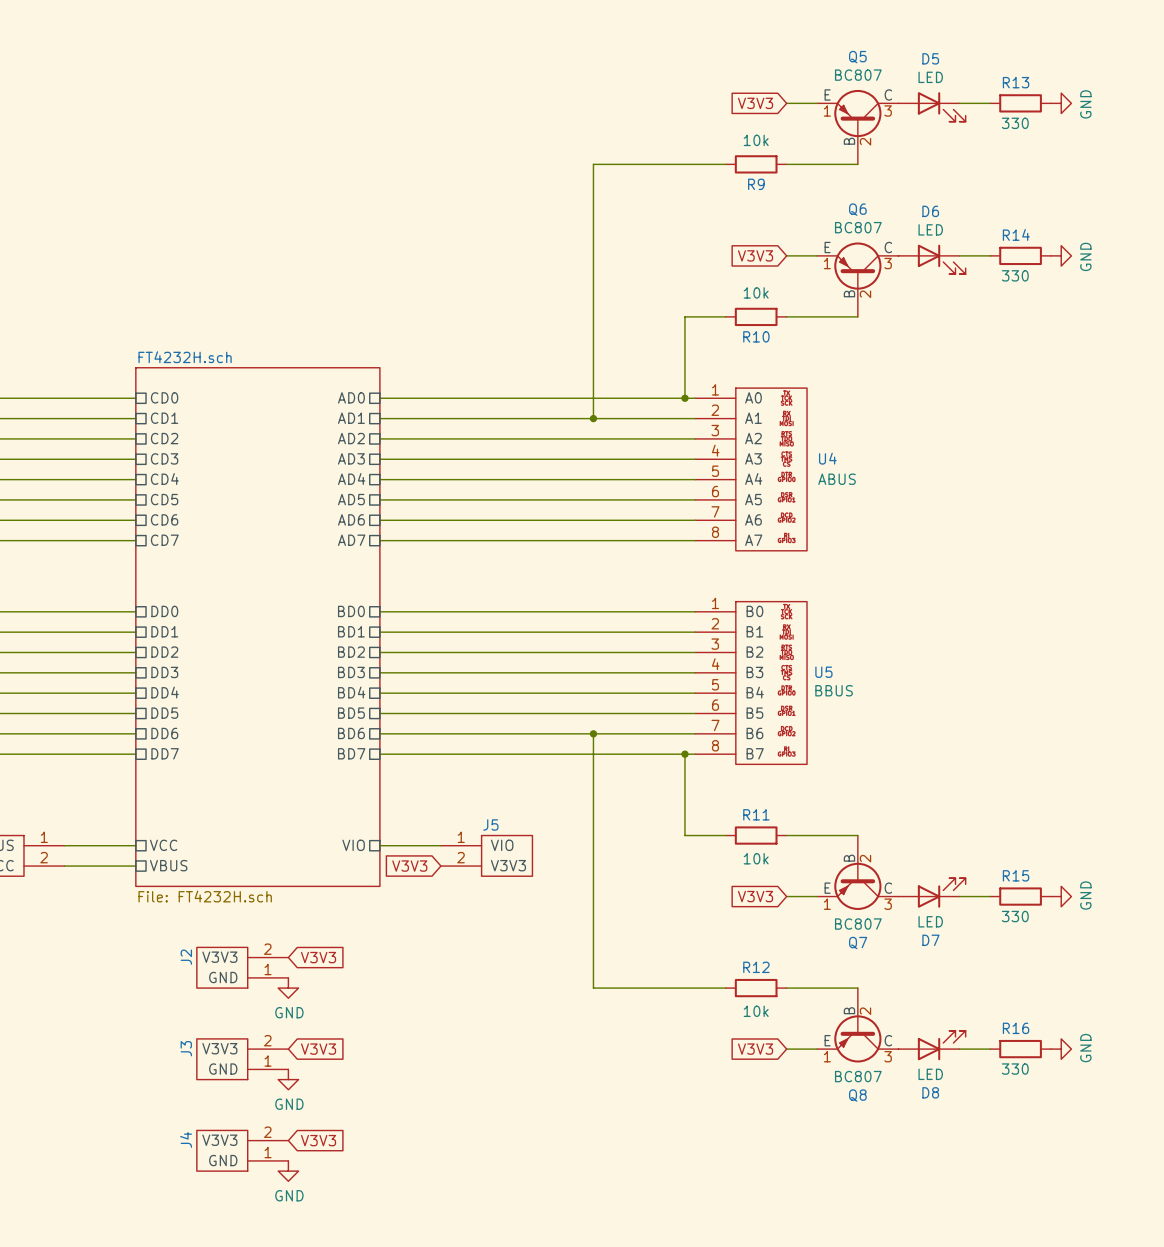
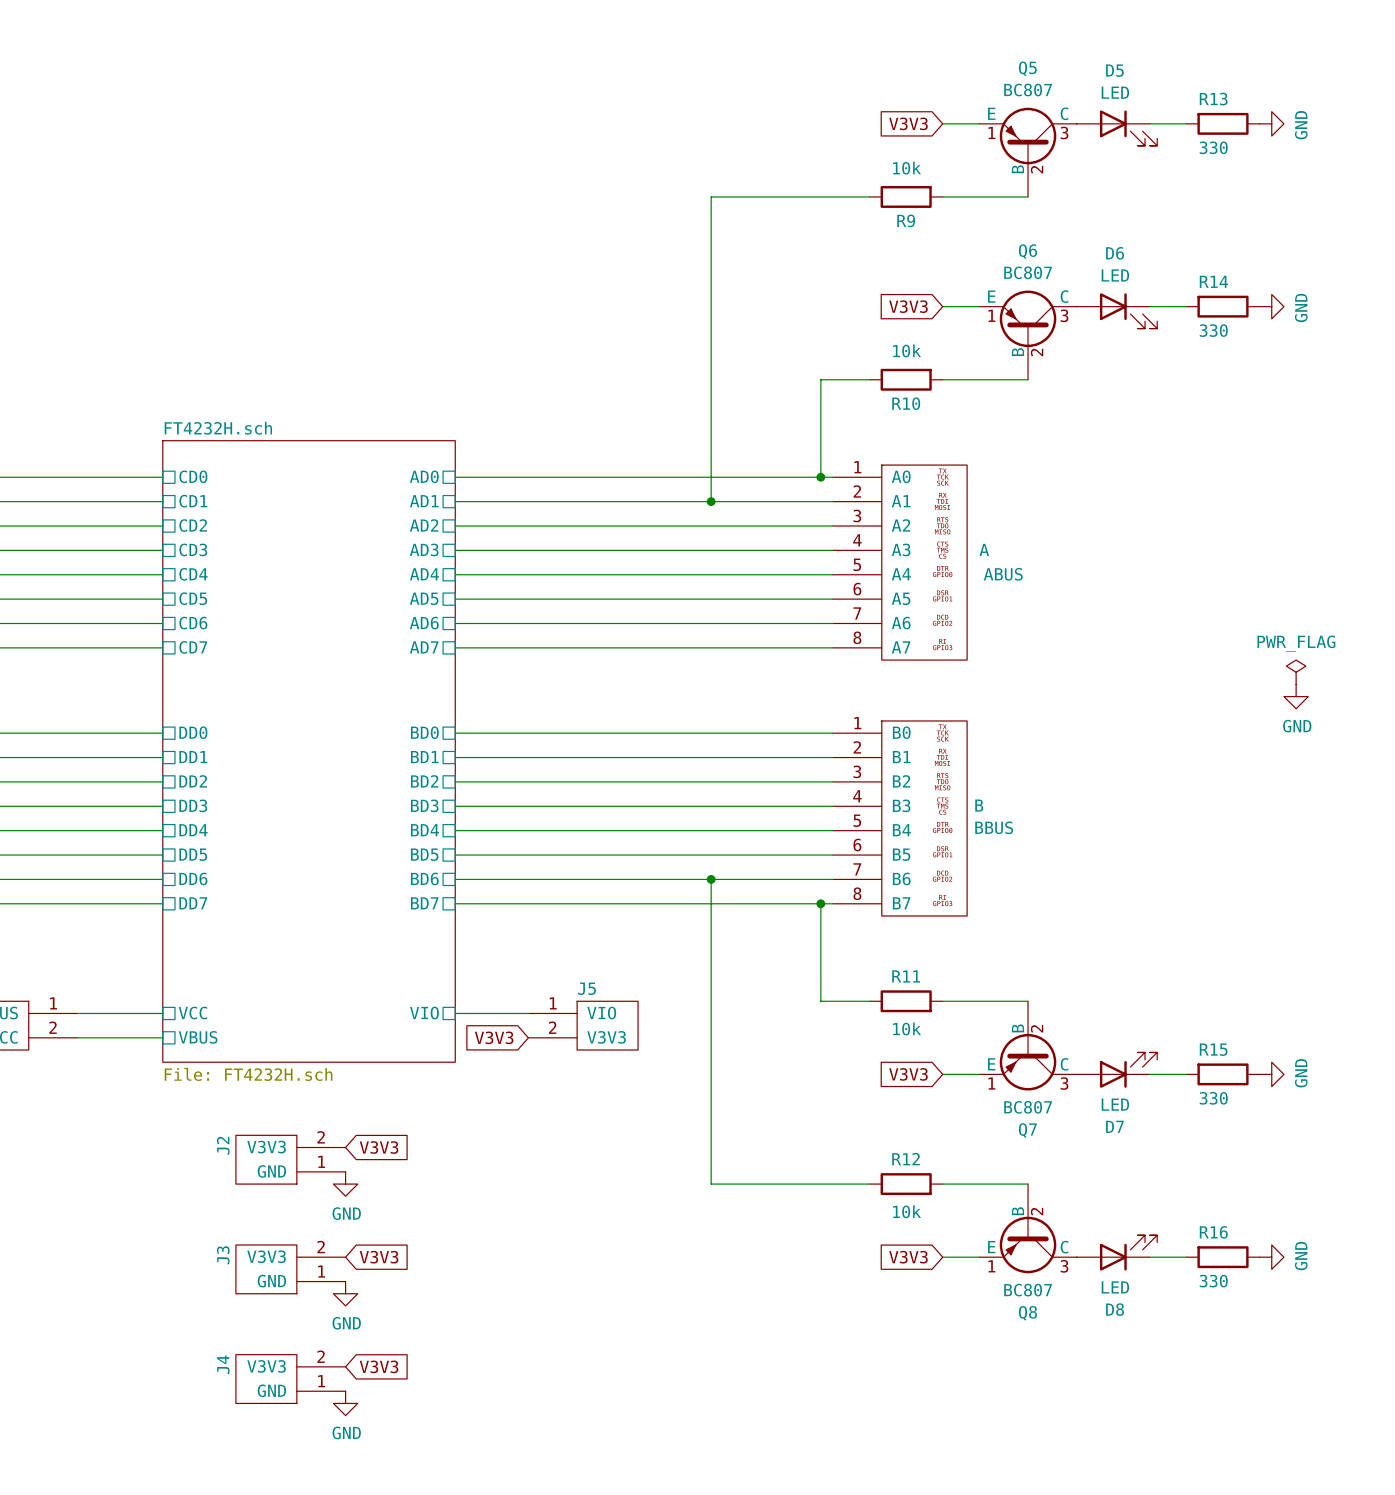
U4 name: U4 (827, 458) -> A (984, 549)
power symbol: none -> PWR_FLAG (1296, 672)
power symbol: none -> GND (1296, 696)
U5 name: U5 (823, 672) -> B (979, 805)

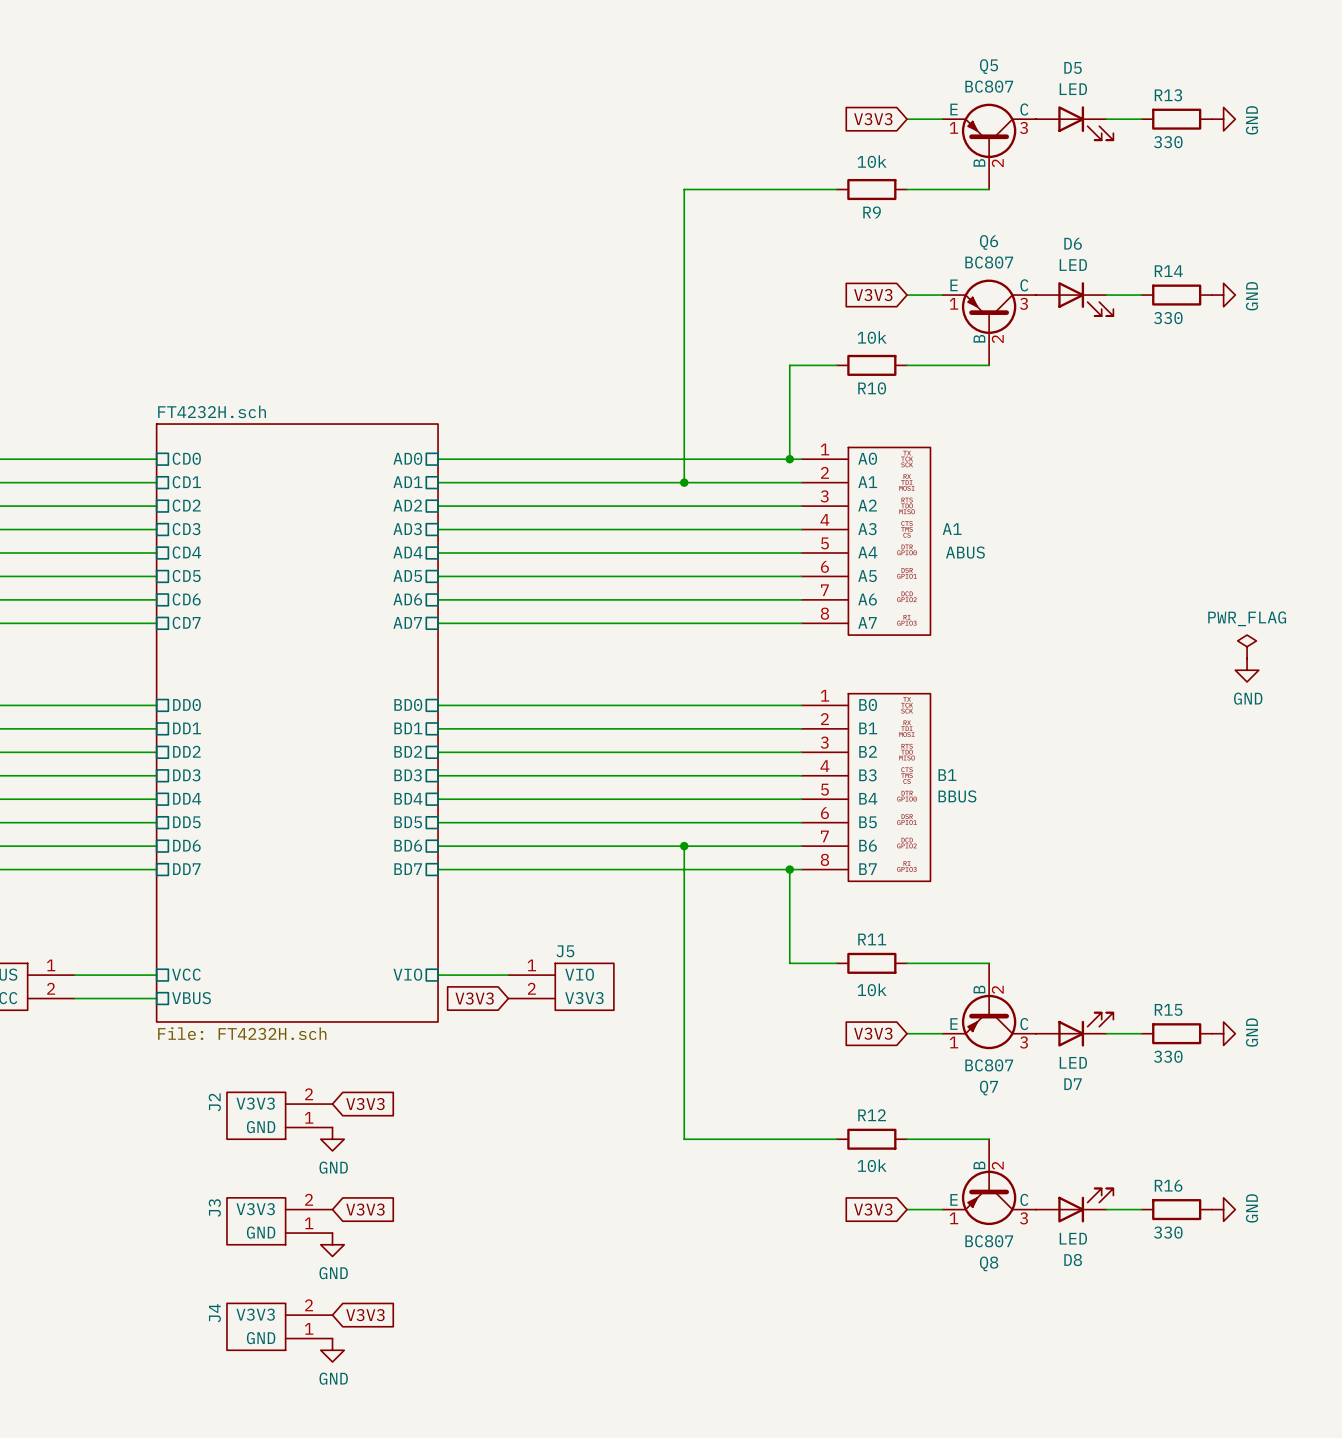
A name: A (984, 549) -> A1 (952, 529)
B name: B (979, 805) -> B1 (947, 775)

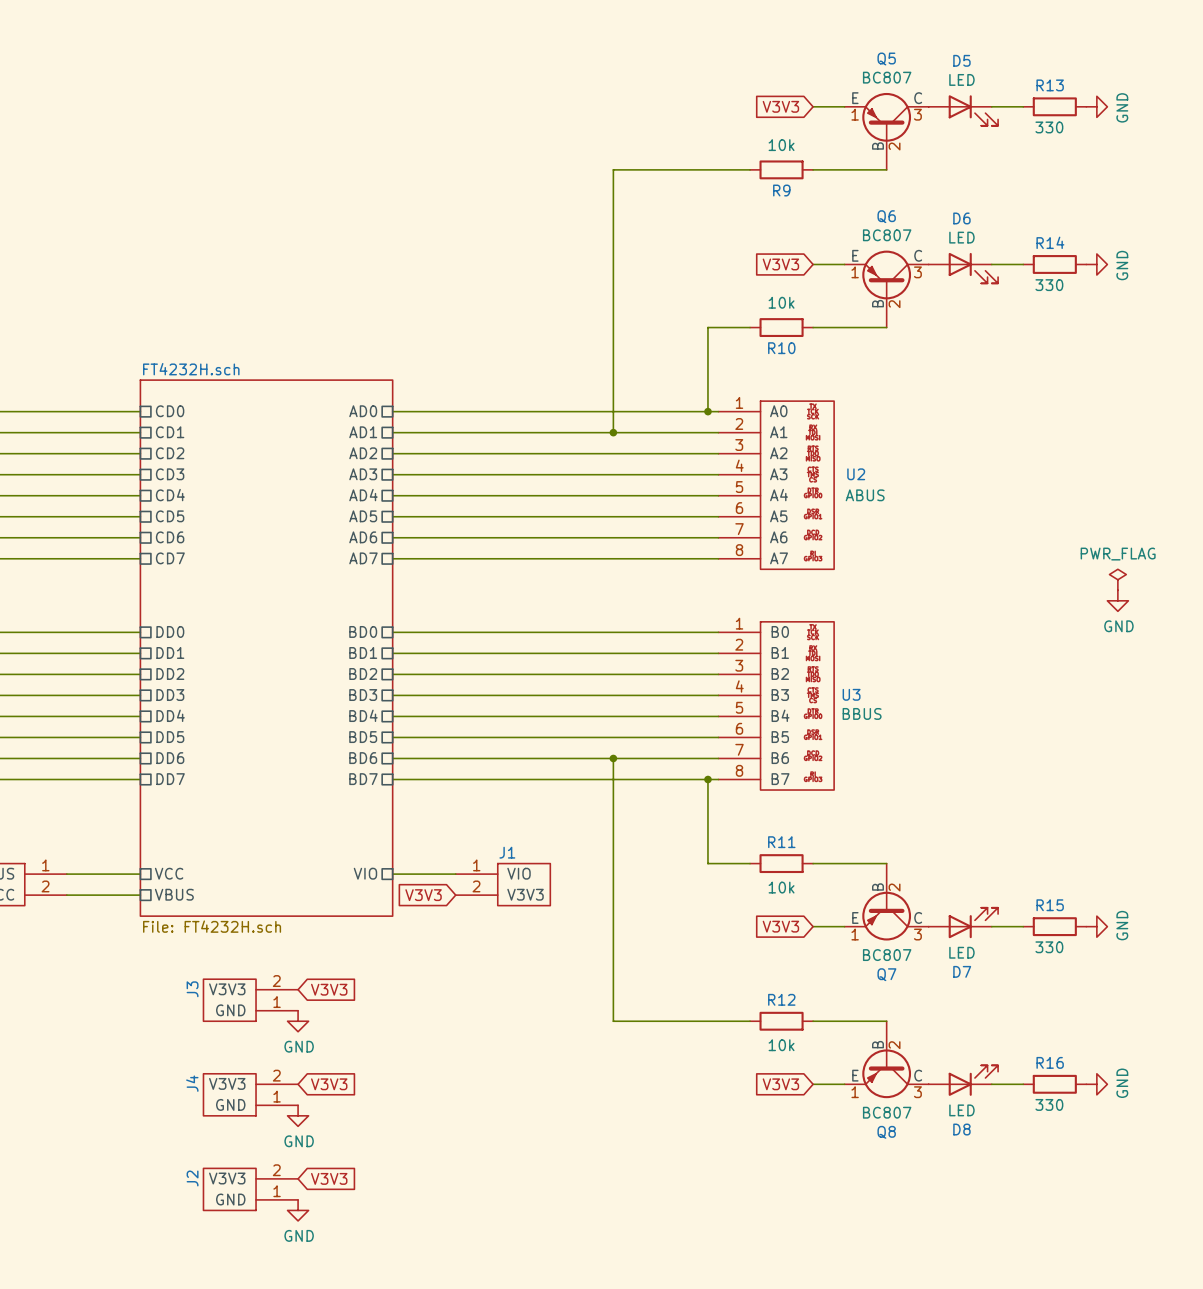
A1 name: A1 (952, 529) -> U2 (856, 474)
B1 name: B1 (947, 775) -> U3 (851, 694)
J5 name: J5 (565, 951) -> J1 (507, 852)
J2 name: J2 (214, 1102) -> J3 (192, 989)
J3 name: J3 (214, 1208) -> J4 (192, 1083)
J4 name: J4 (214, 1313) -> J2 (192, 1178)

